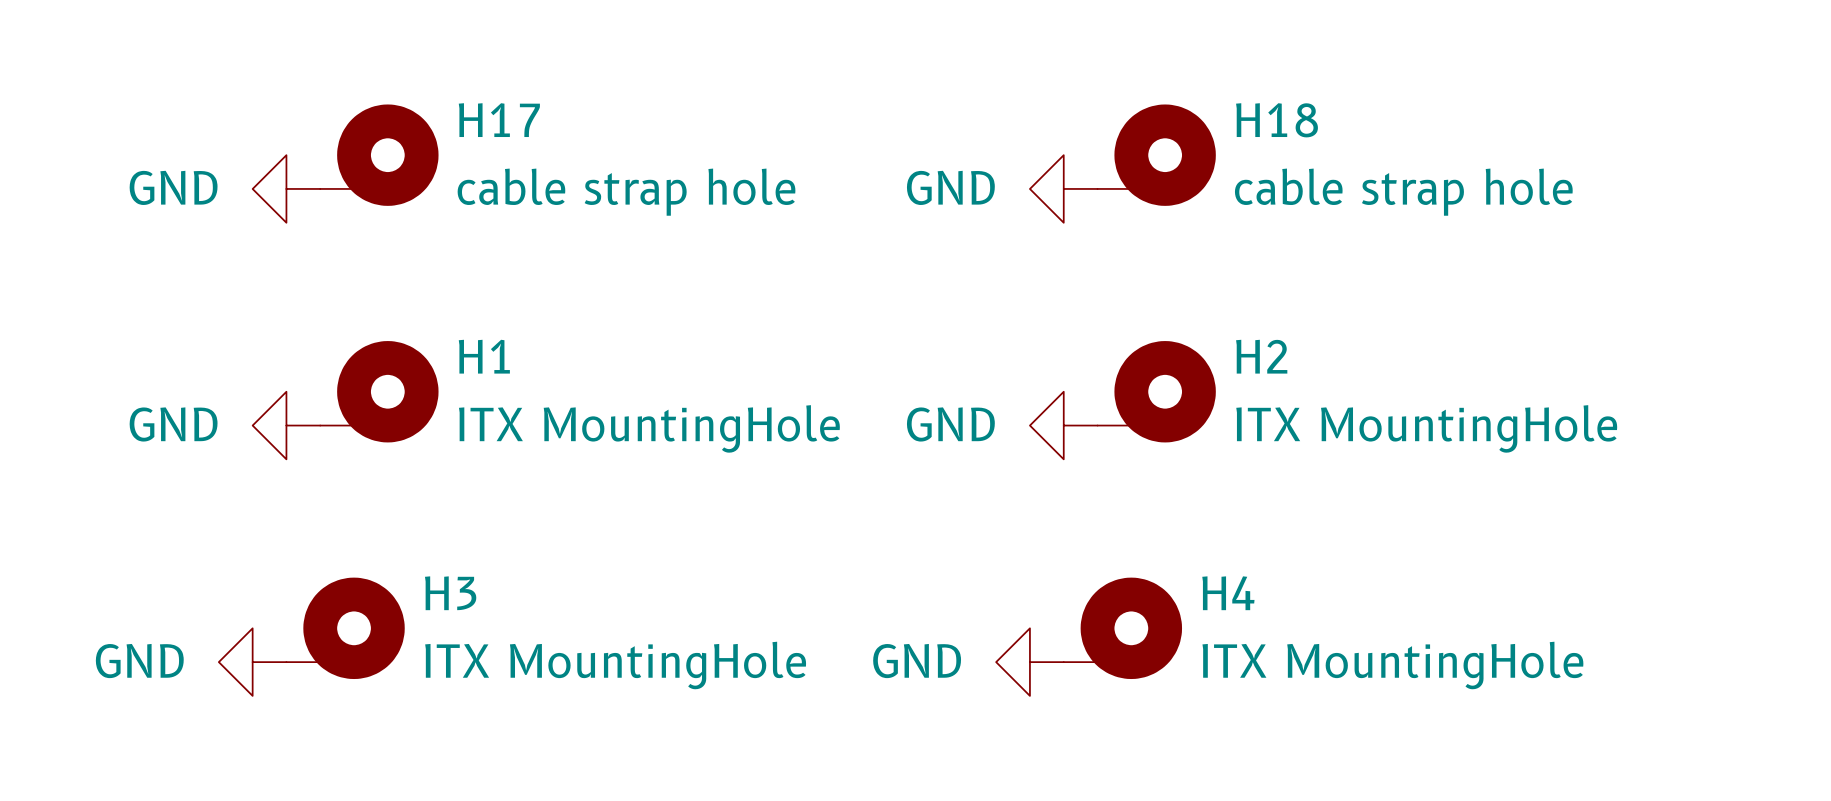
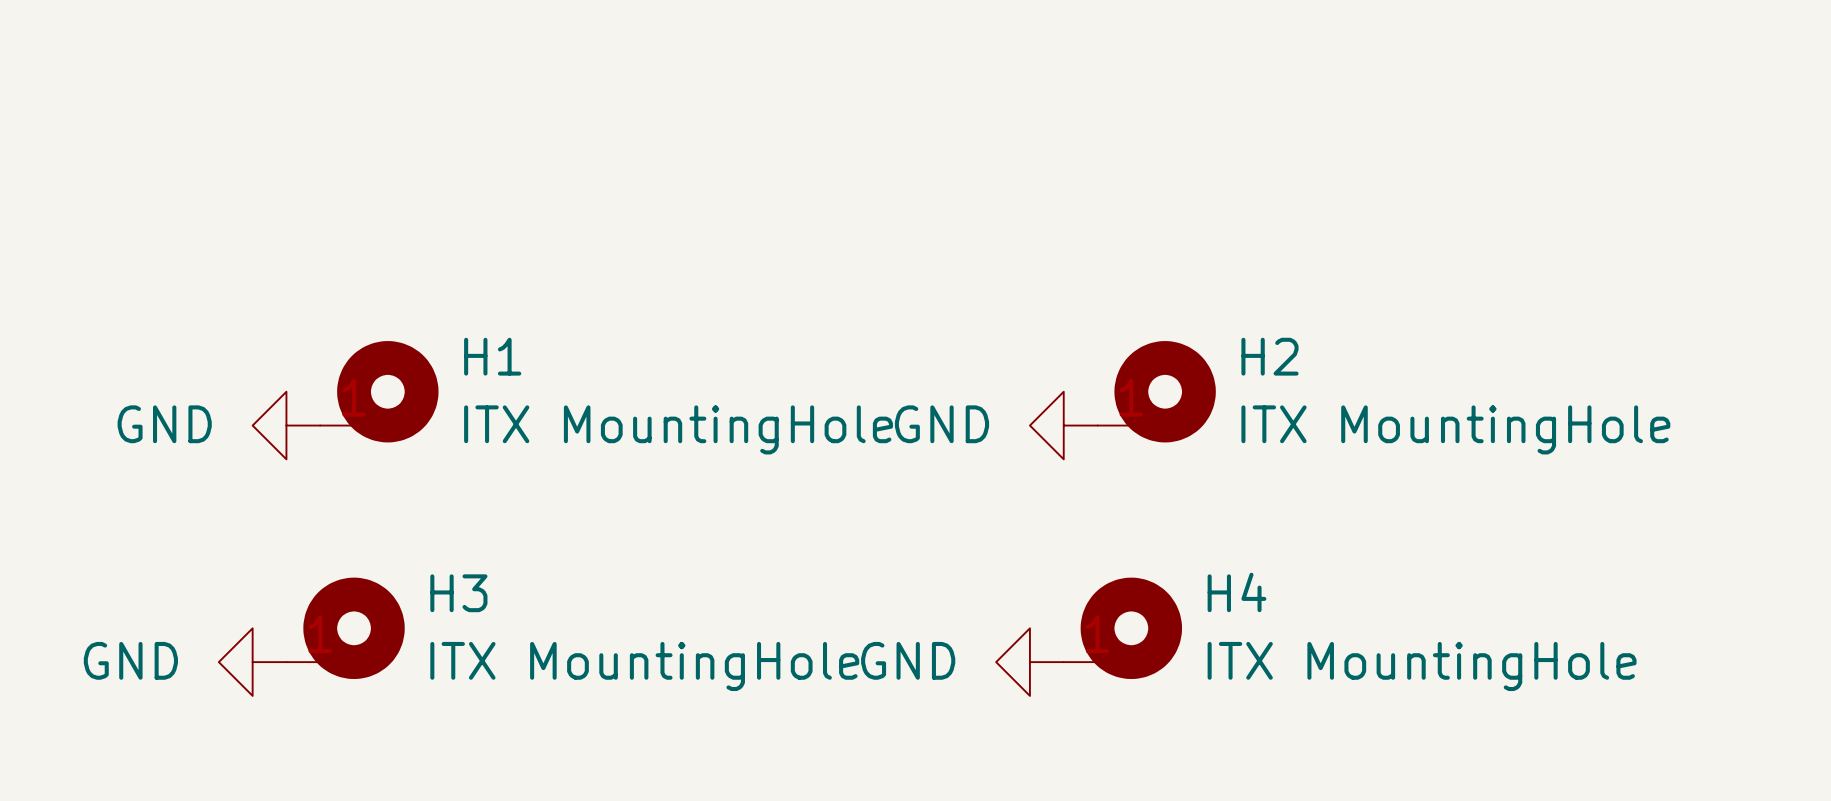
H17: cable strap hole (379, 155) -> none
H18: cable strap hole (1156, 155) -> none
power symbol: GND (286, 188) -> none
power symbol: GND (1063, 188) -> none

